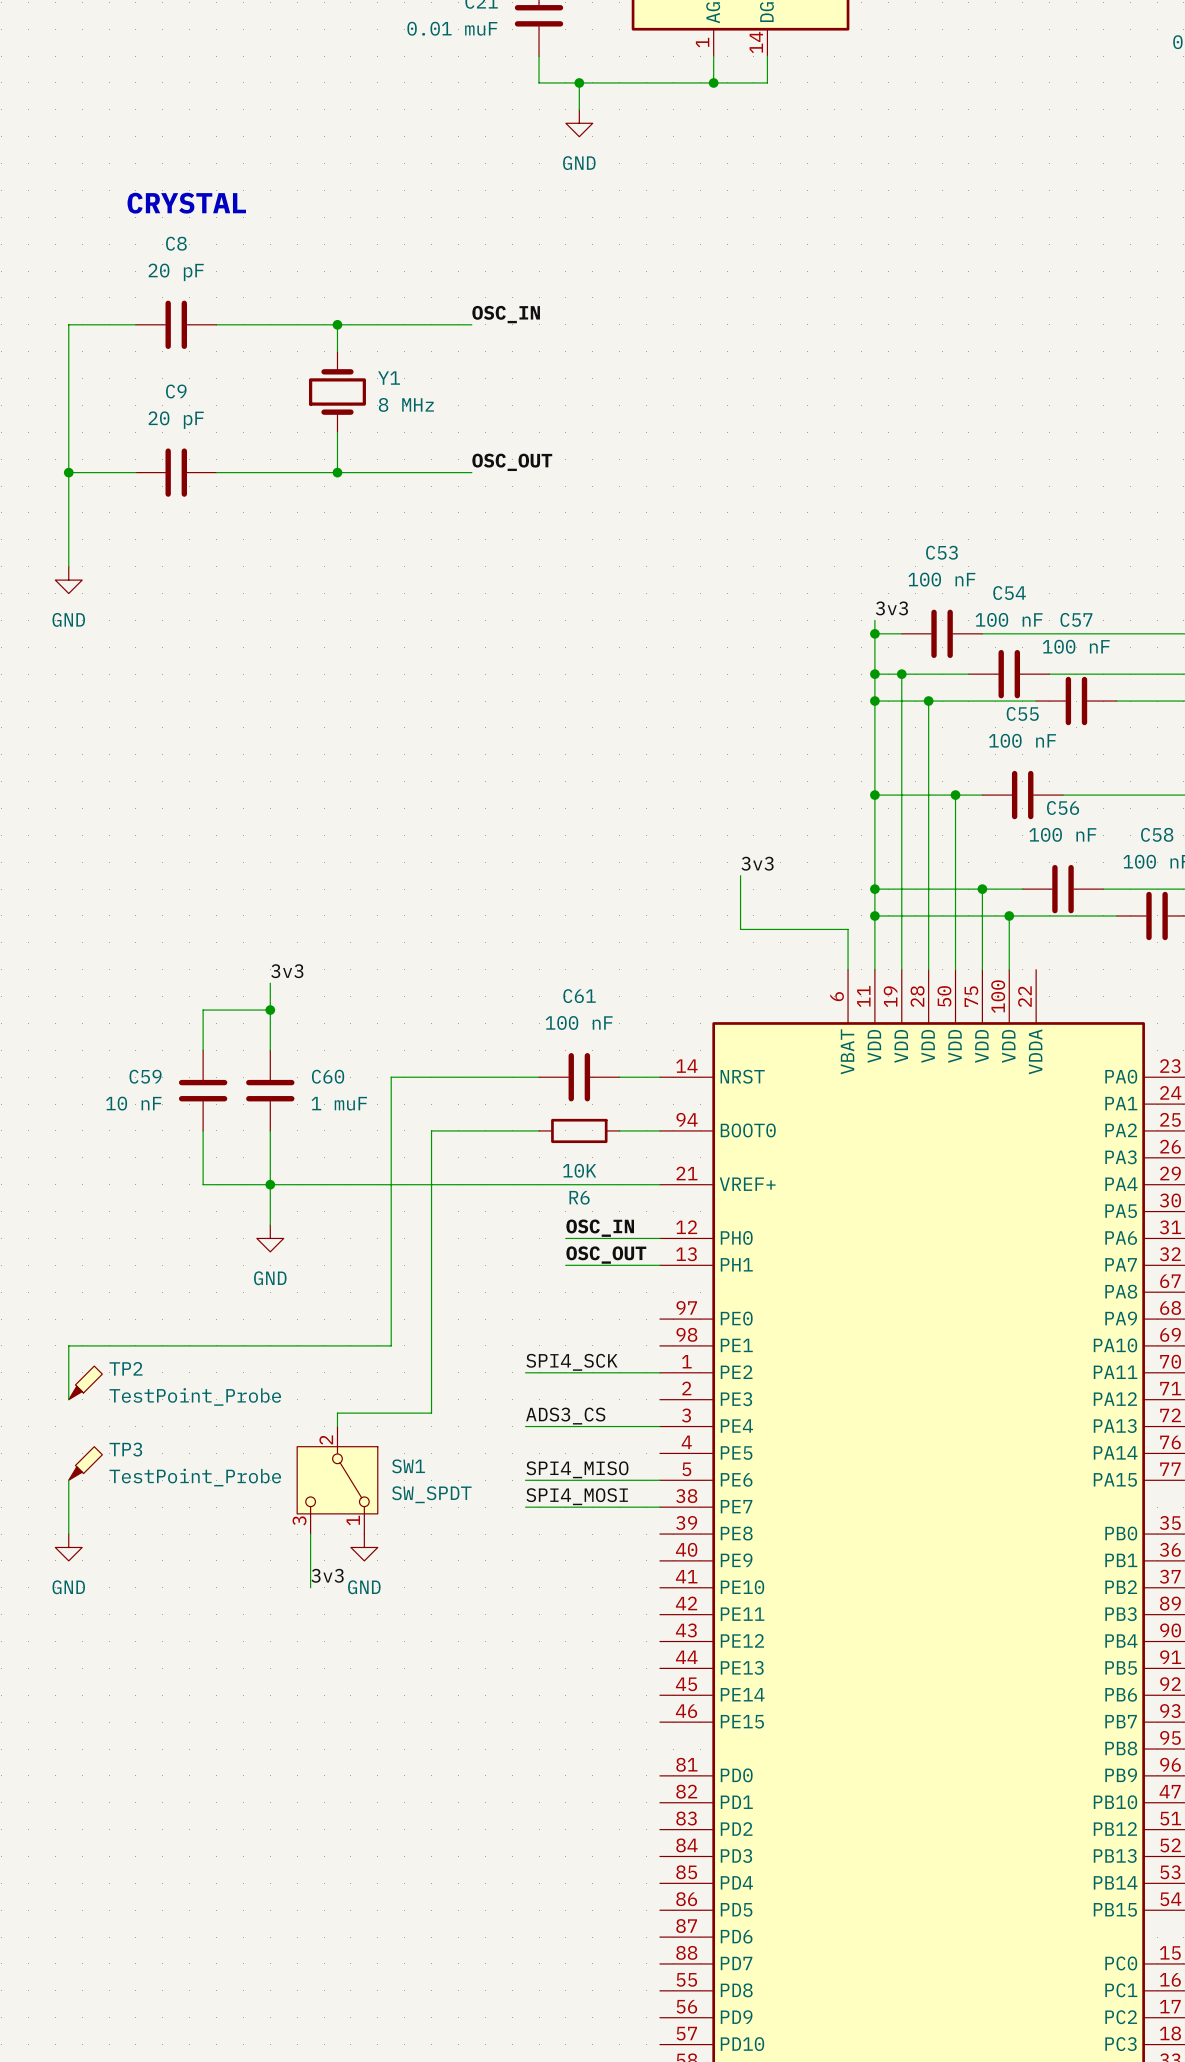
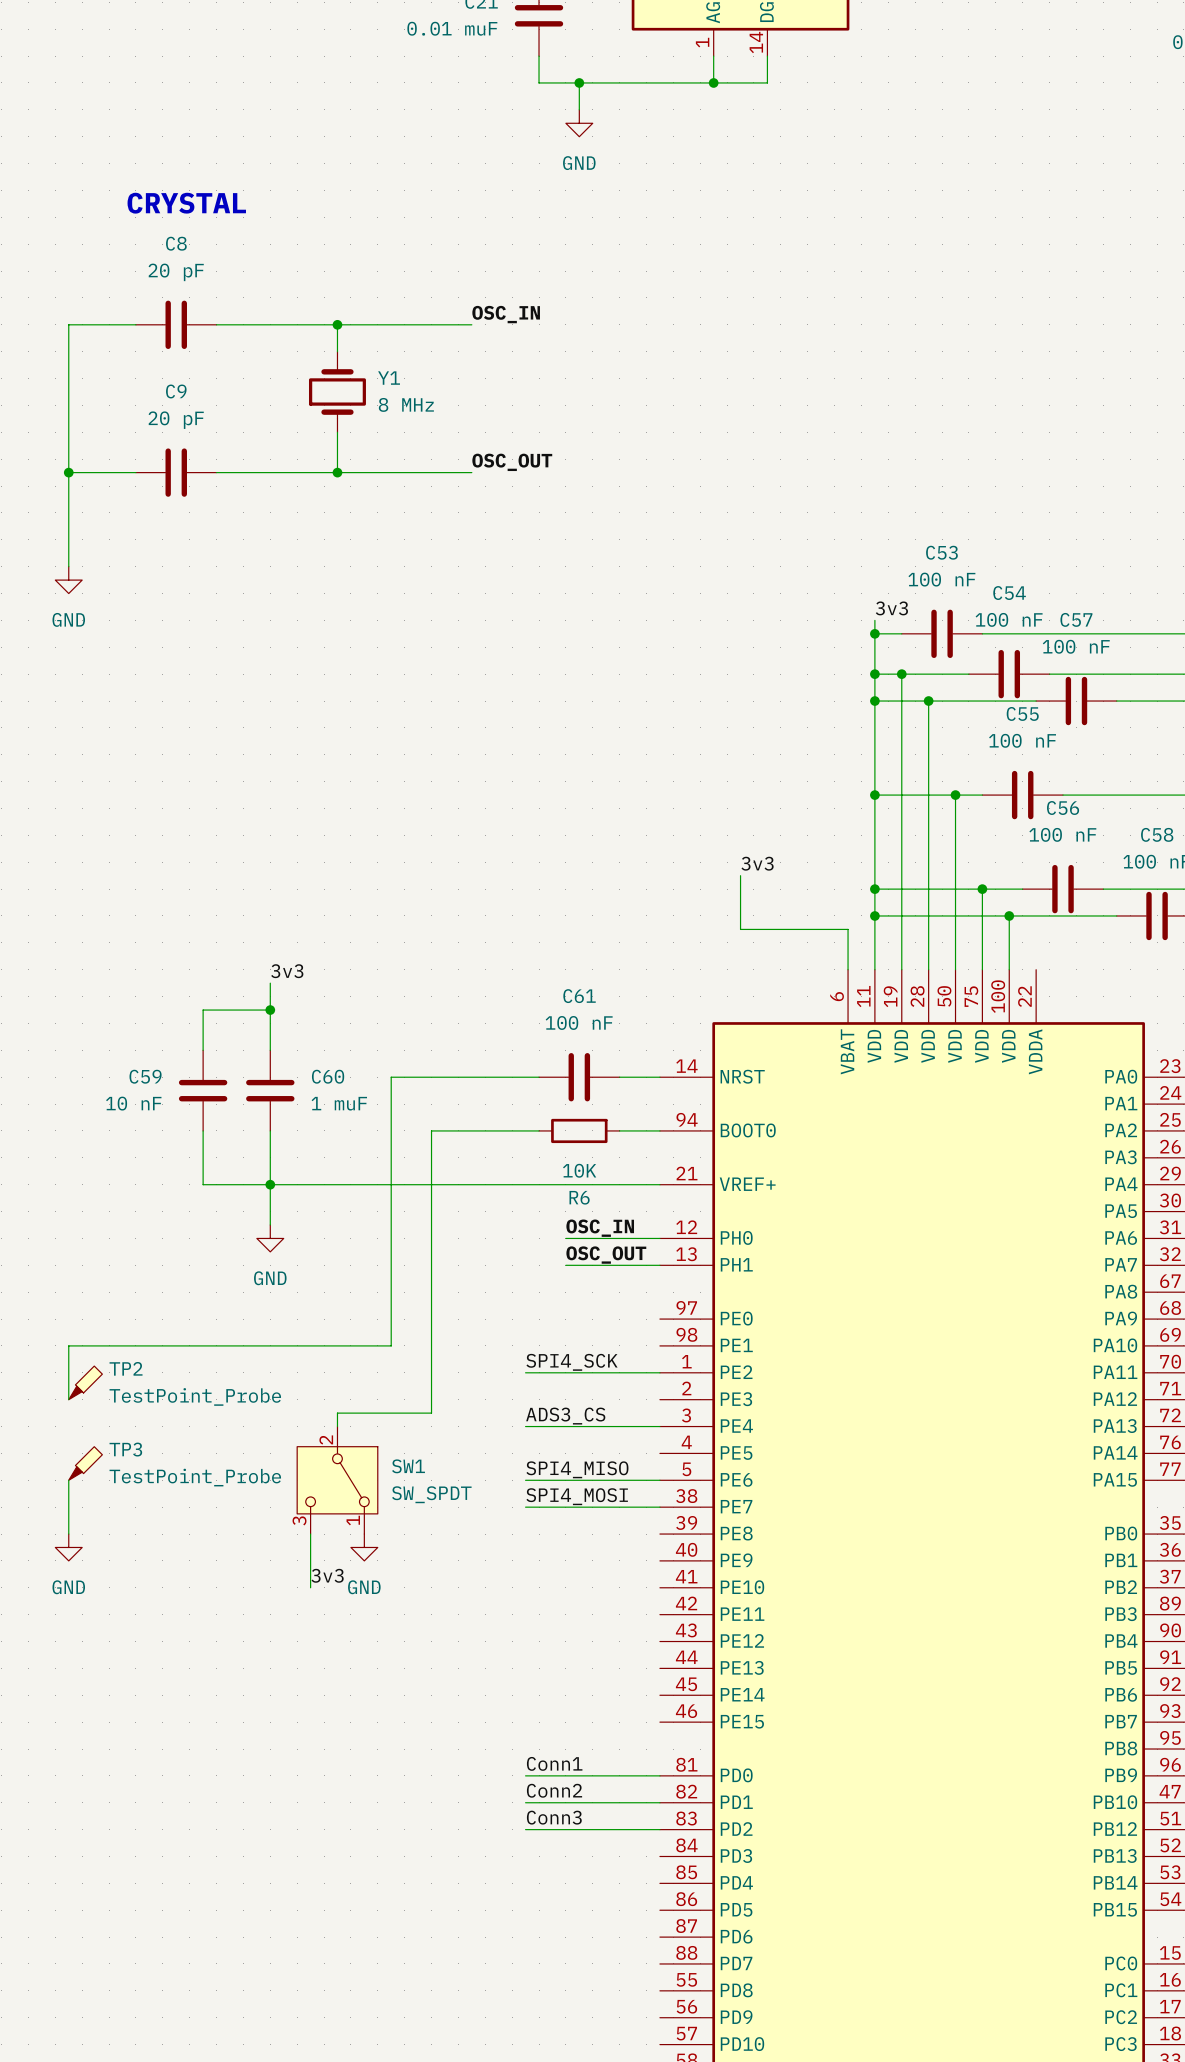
label: none -> Conn1 (554, 1763)
wire: none -> (525, 1775) (659, 1775)
label: none -> Conn2 (554, 1790)
wire: none -> (525, 1802) (659, 1802)
label: none -> Conn3 (554, 1817)
wire: none -> (525, 1829) (659, 1829)

